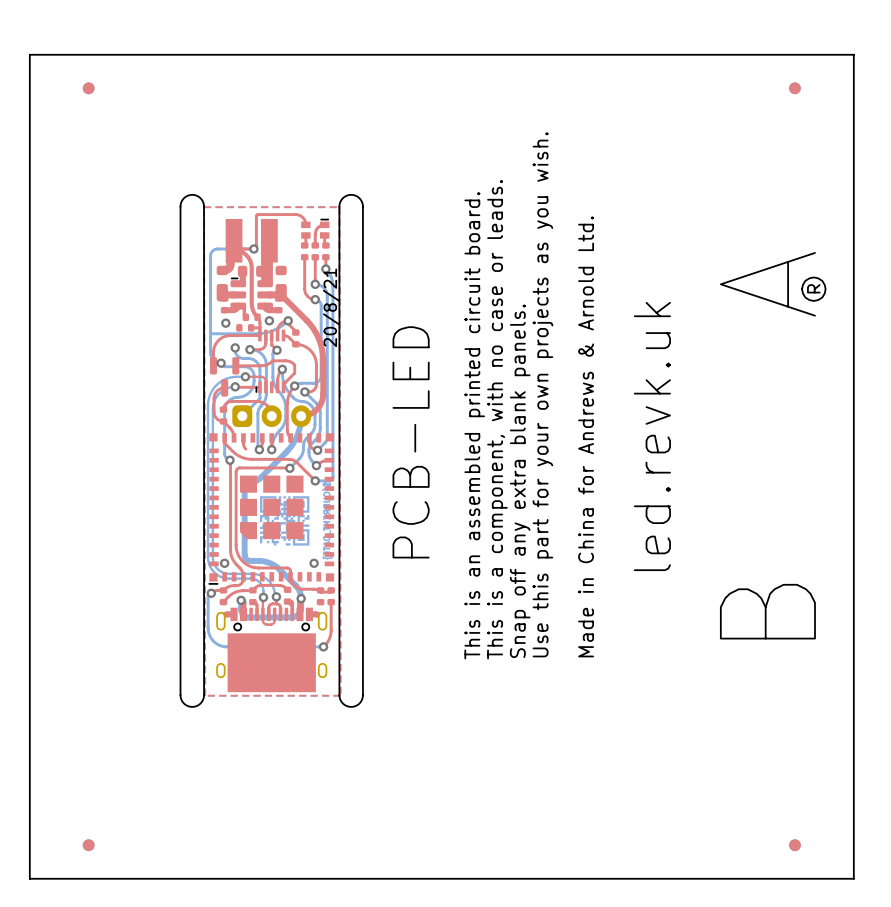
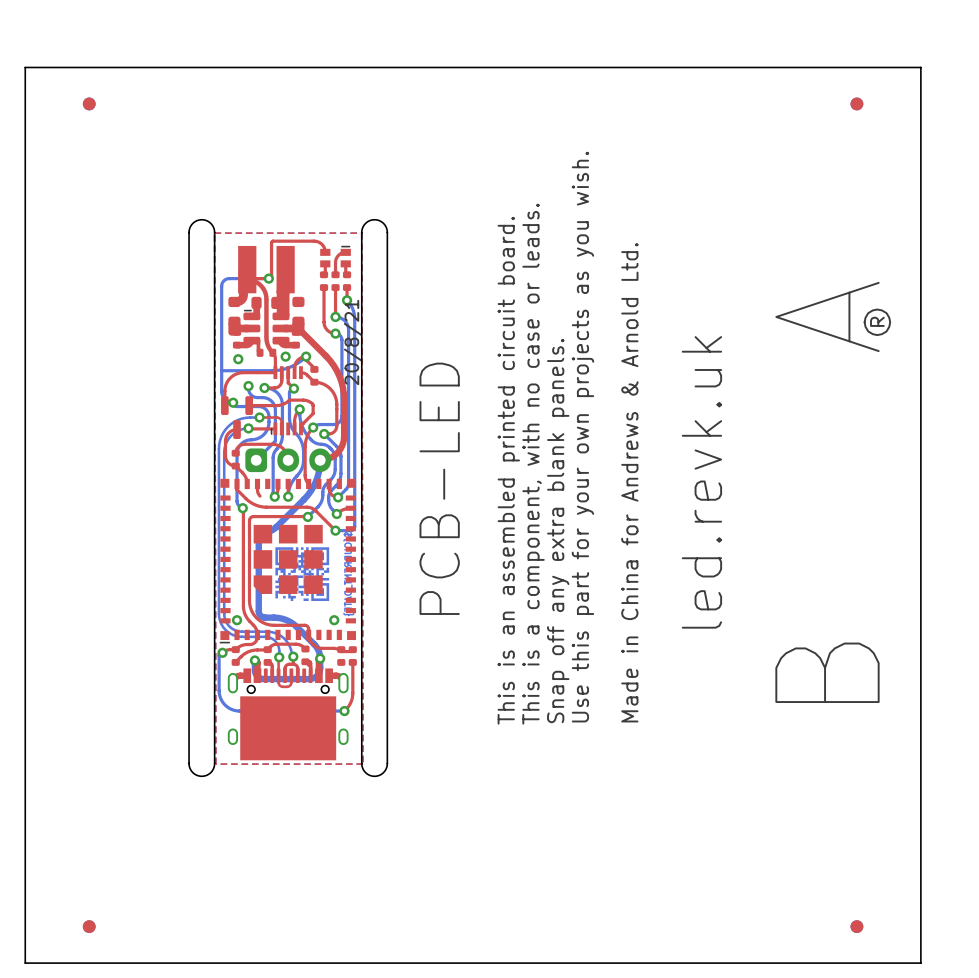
part: (245, 327) -> none
top track: (251, 327) (259, 327) -> none

